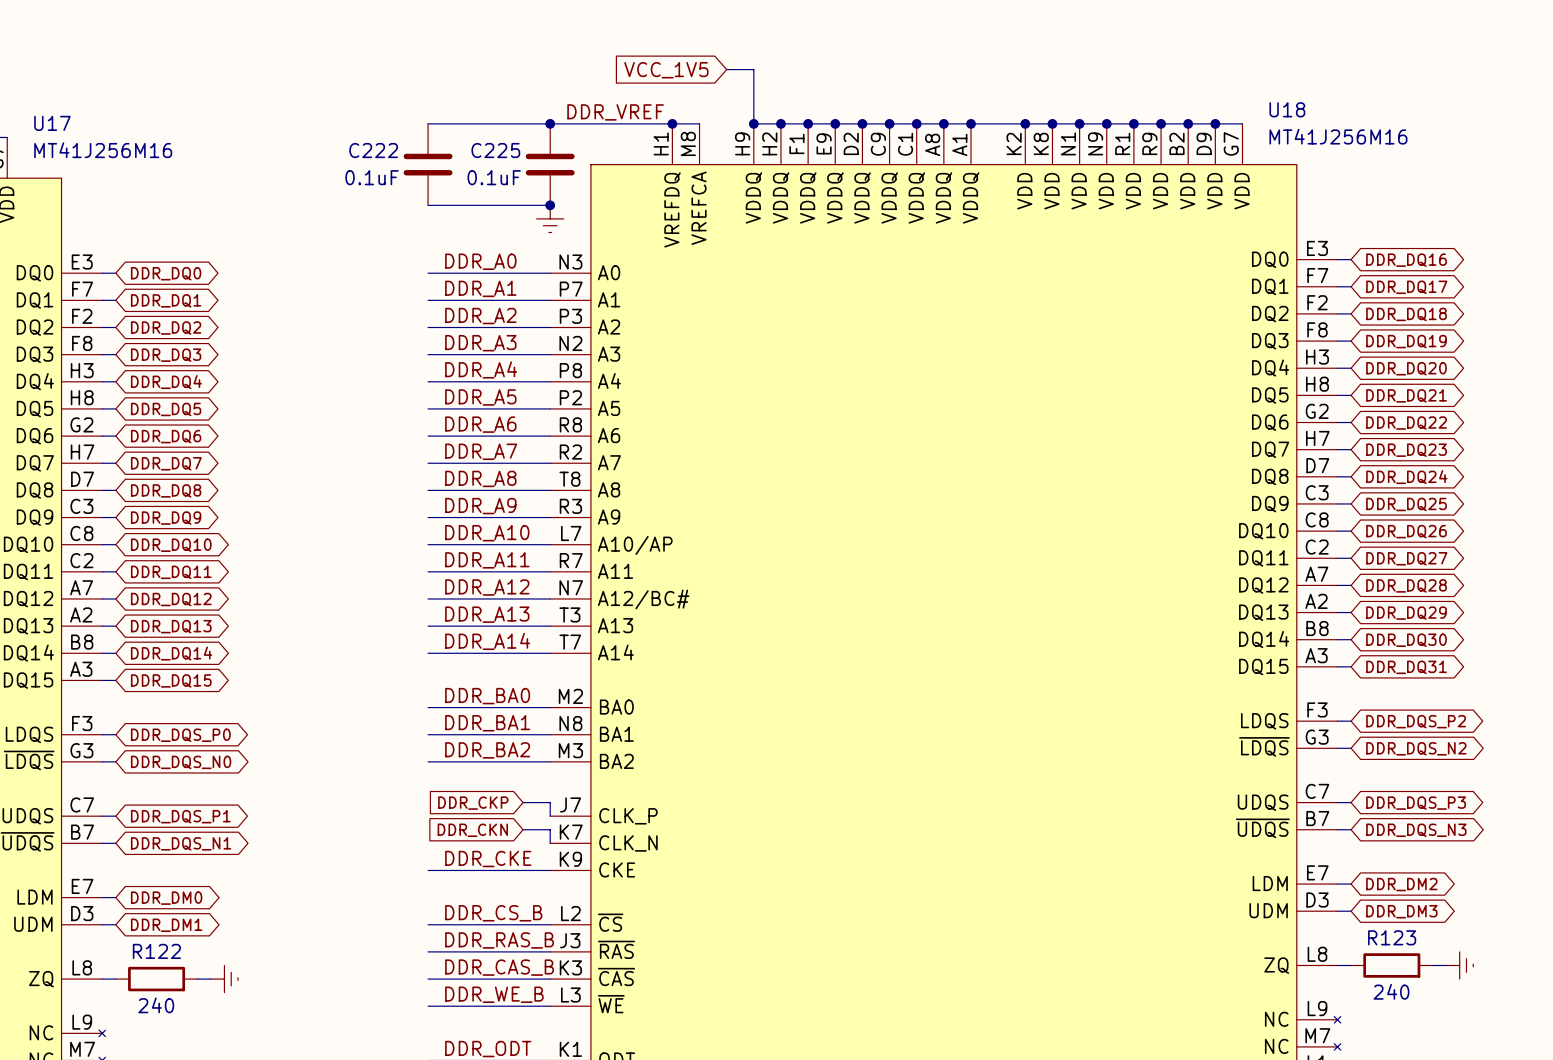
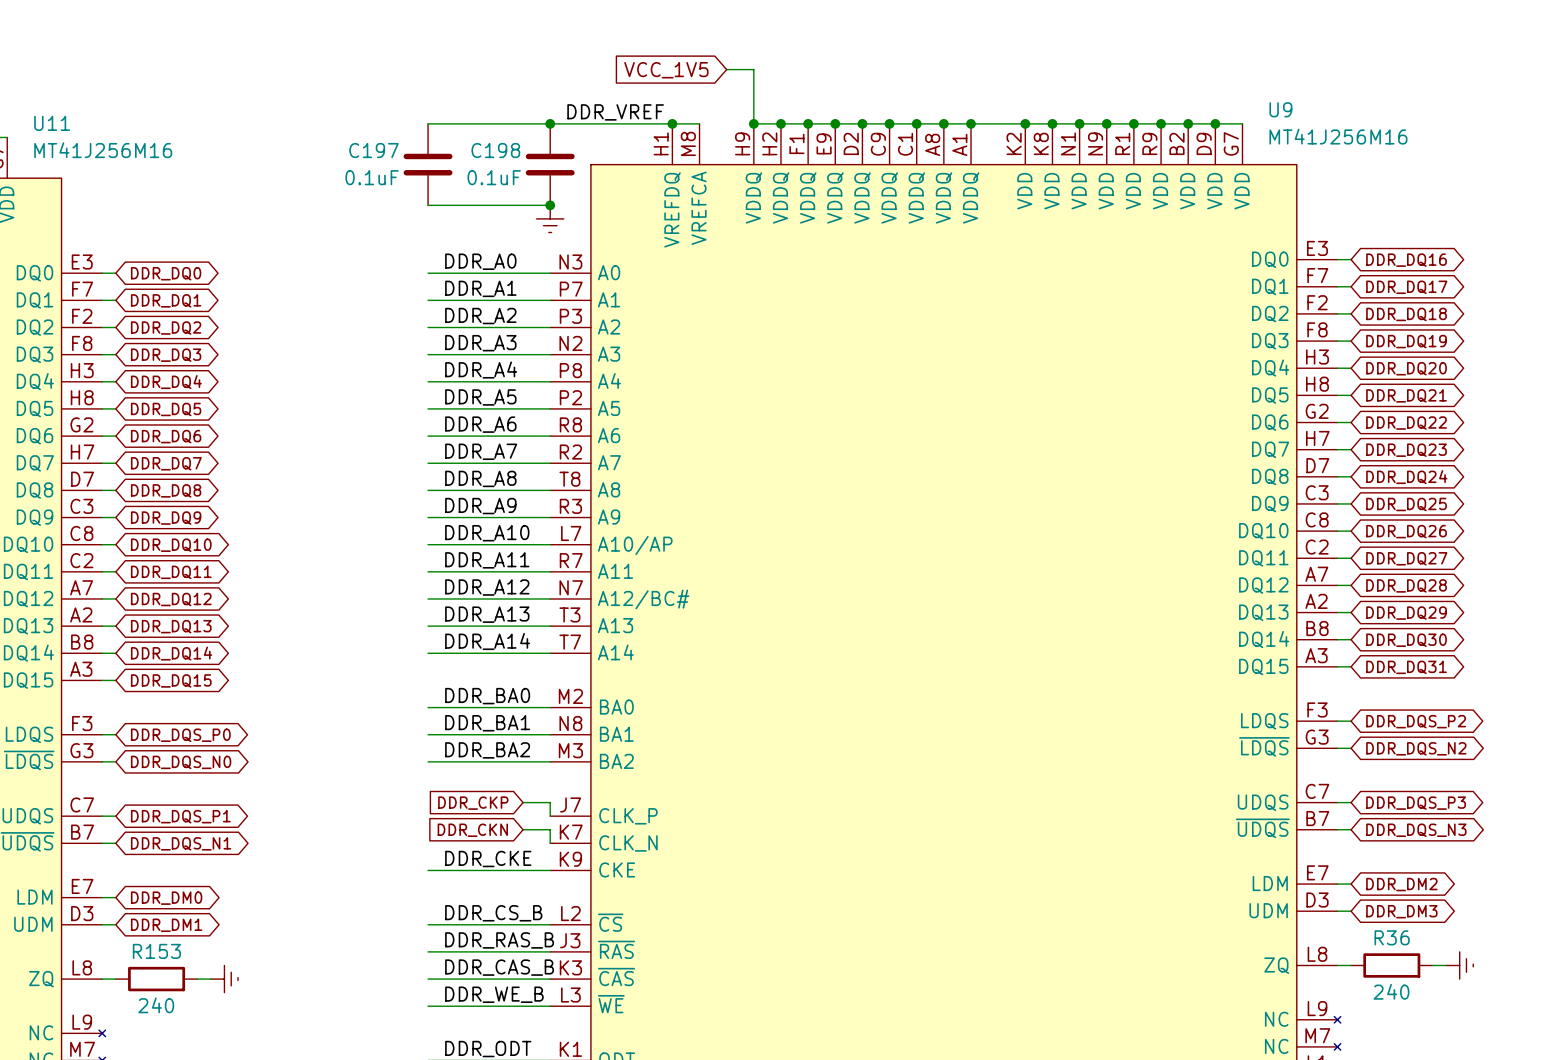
U18 name: U18 (1287, 109) -> U9 (1280, 109)
U17 name: U17 (52, 123) -> U11 (52, 123)
C222 name: C222 (373, 150) -> C197 (373, 150)
C225 name: C225 (495, 150) -> C198 (495, 150)
R123 name: R123 (1392, 937) -> R36 (1392, 937)
R122 name: R122 (156, 951) -> R153 (156, 951)

